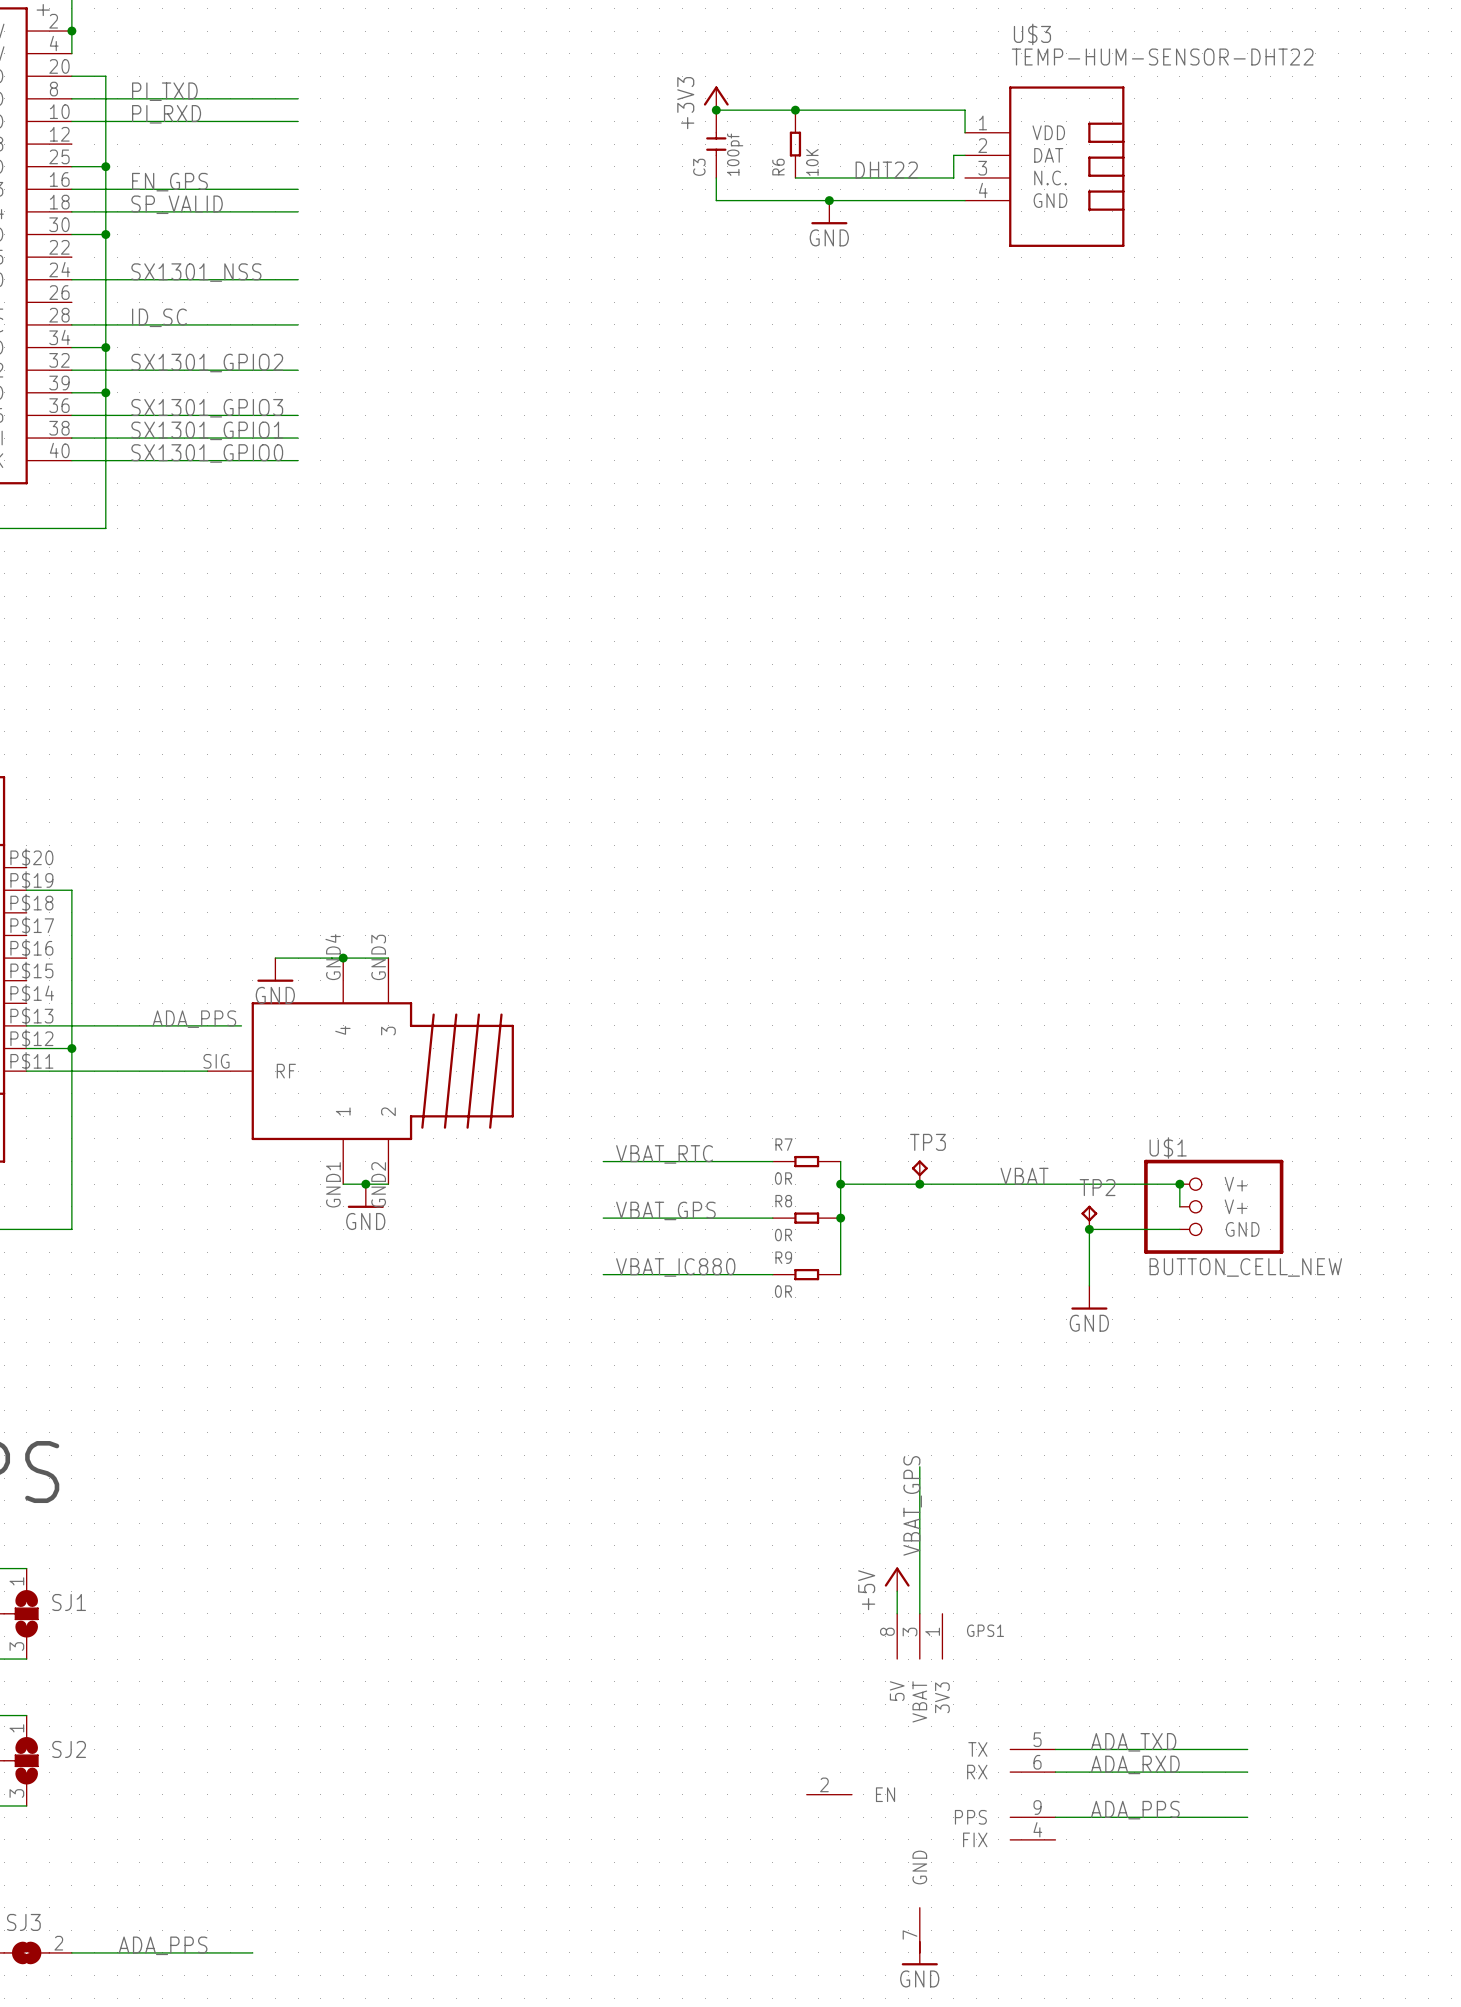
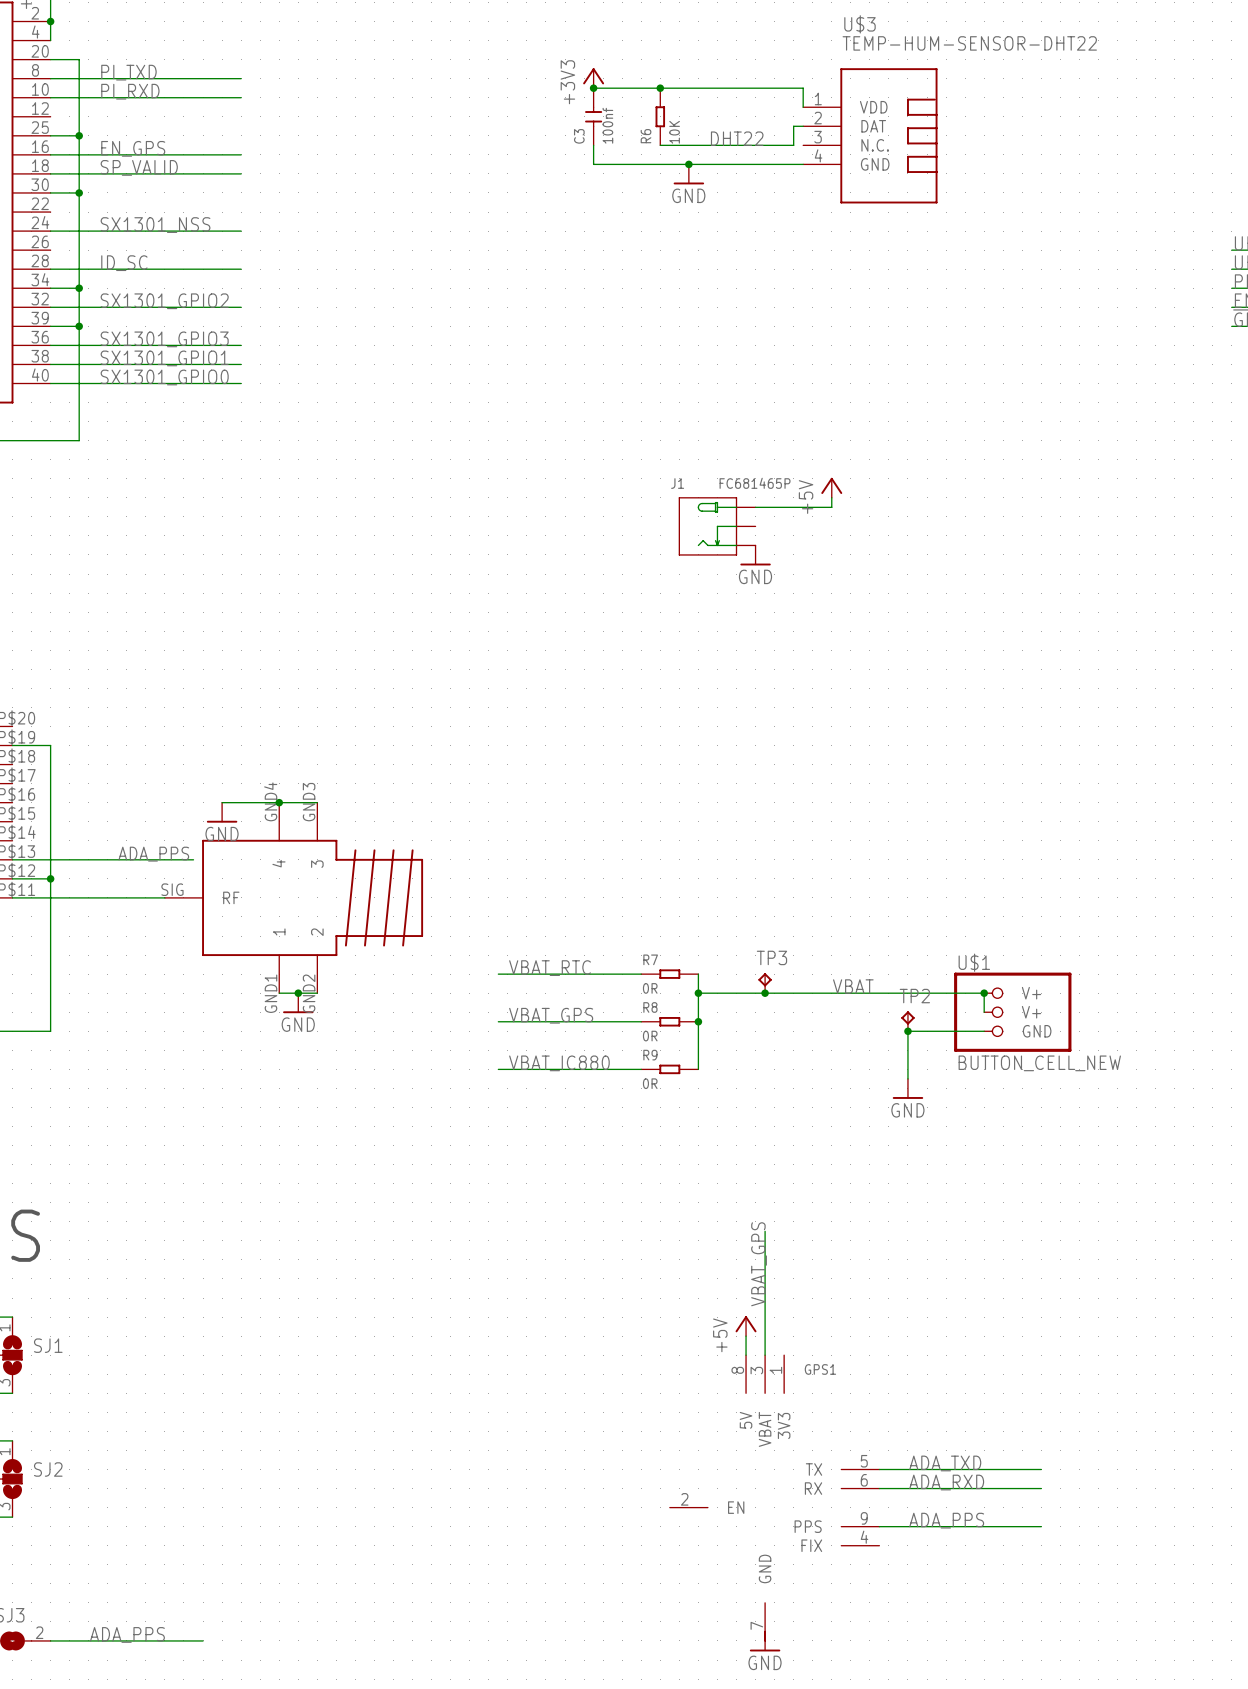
C3 value: 100pf (735, 154) -> 100nf (607, 125)
power symbol: none -> +5V (831, 487)
wire: none -> (831, 497) (831, 507) (755, 507)
J1: none -> FC681465P (717, 526)
power symbol: none -> GND (755, 555)

